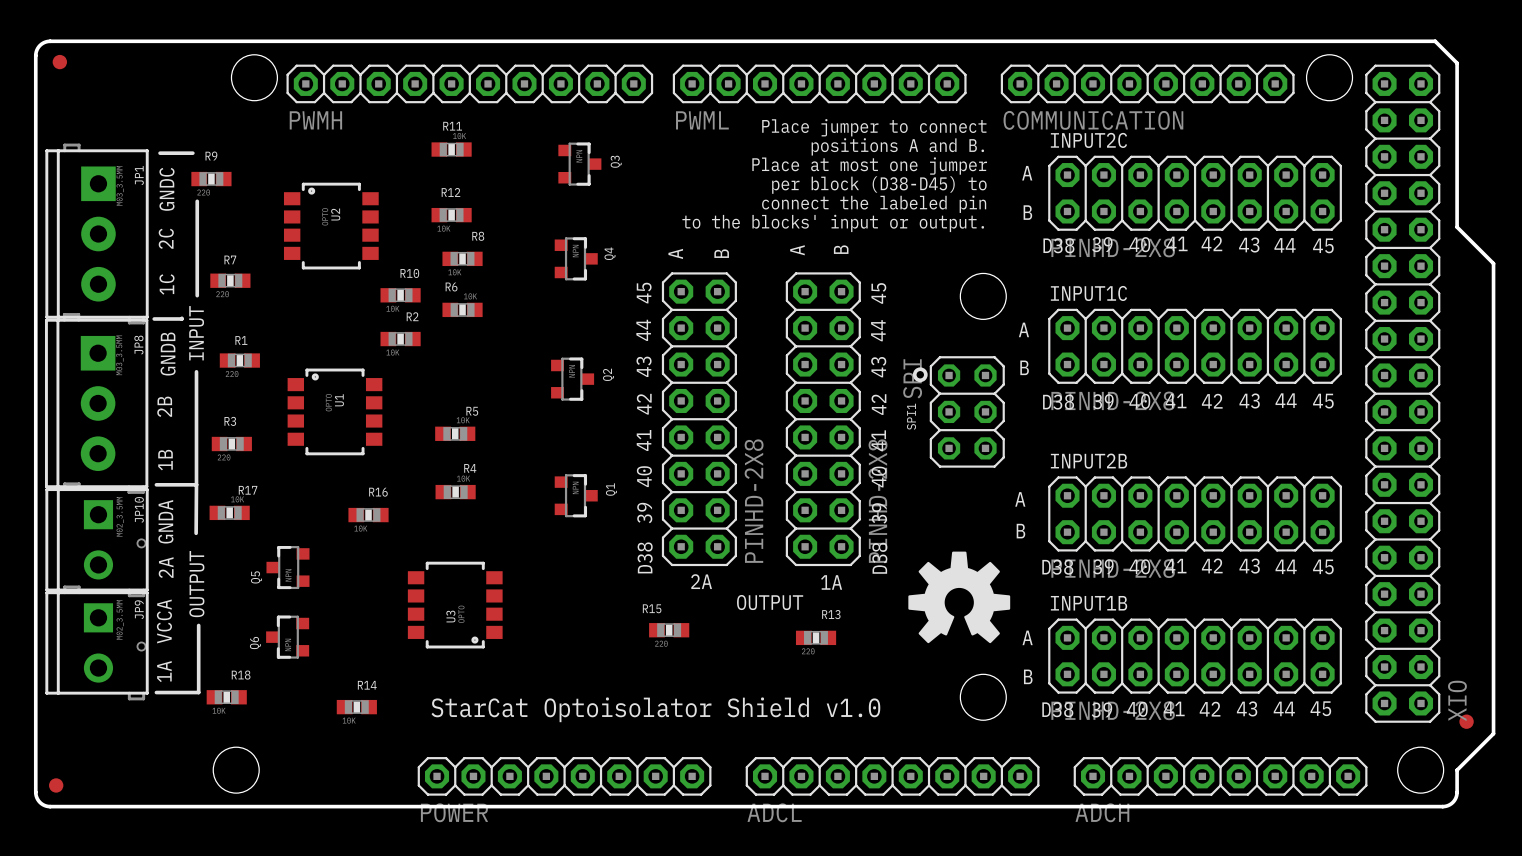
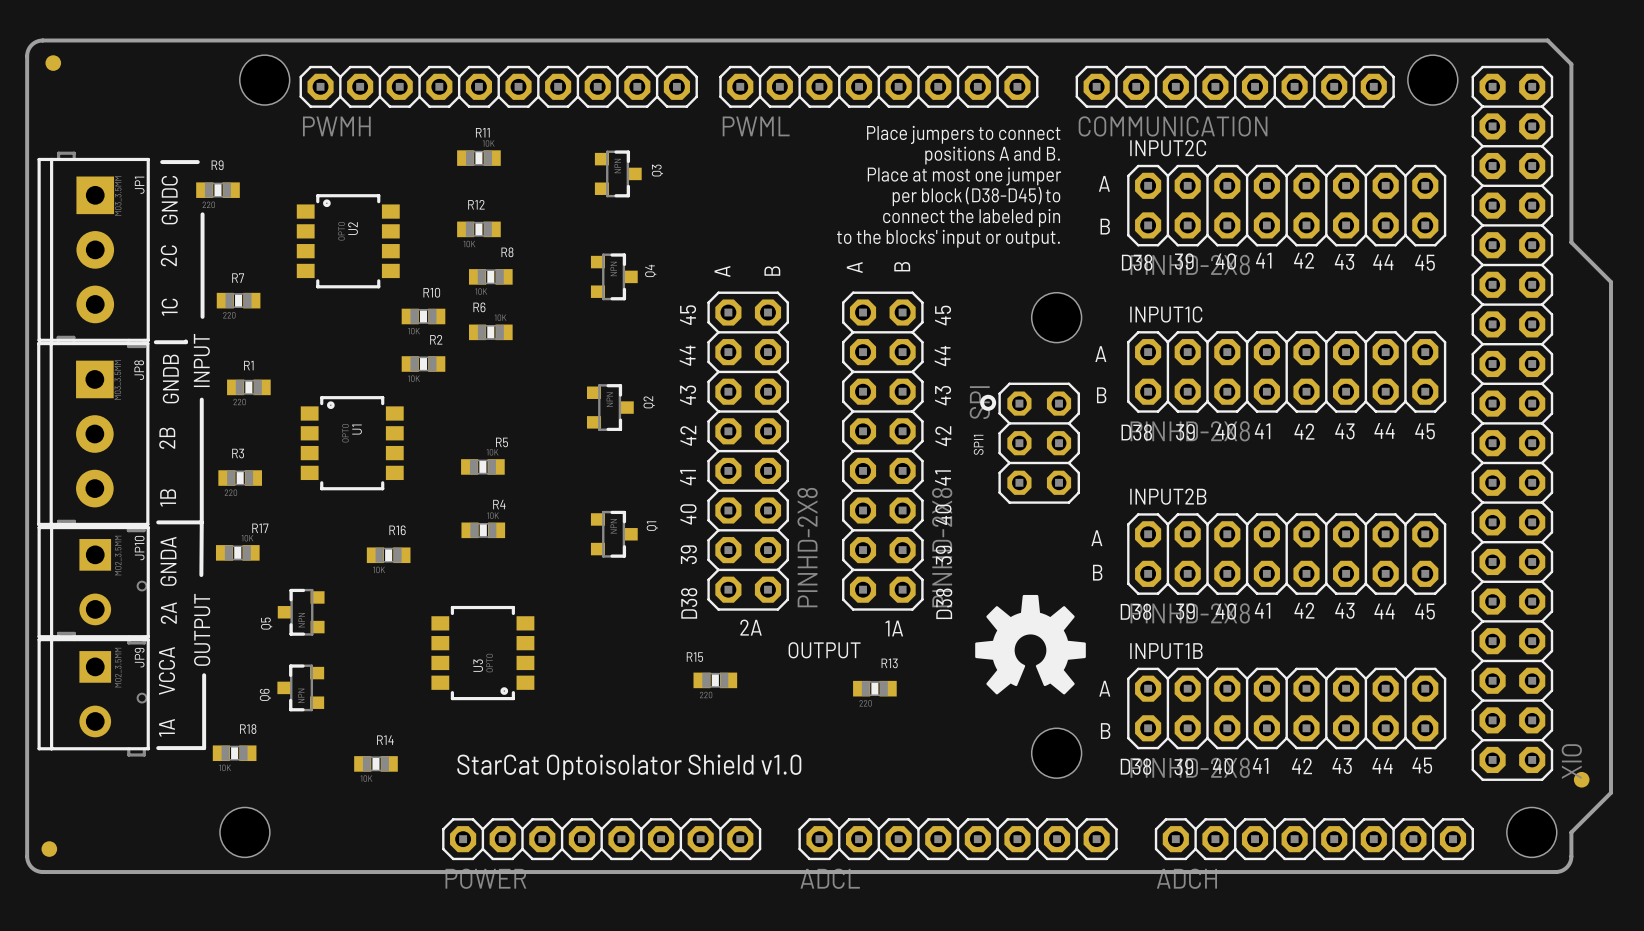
text: Place jumper to connect (874, 127) -> Place jumpers to connect (963, 134)

